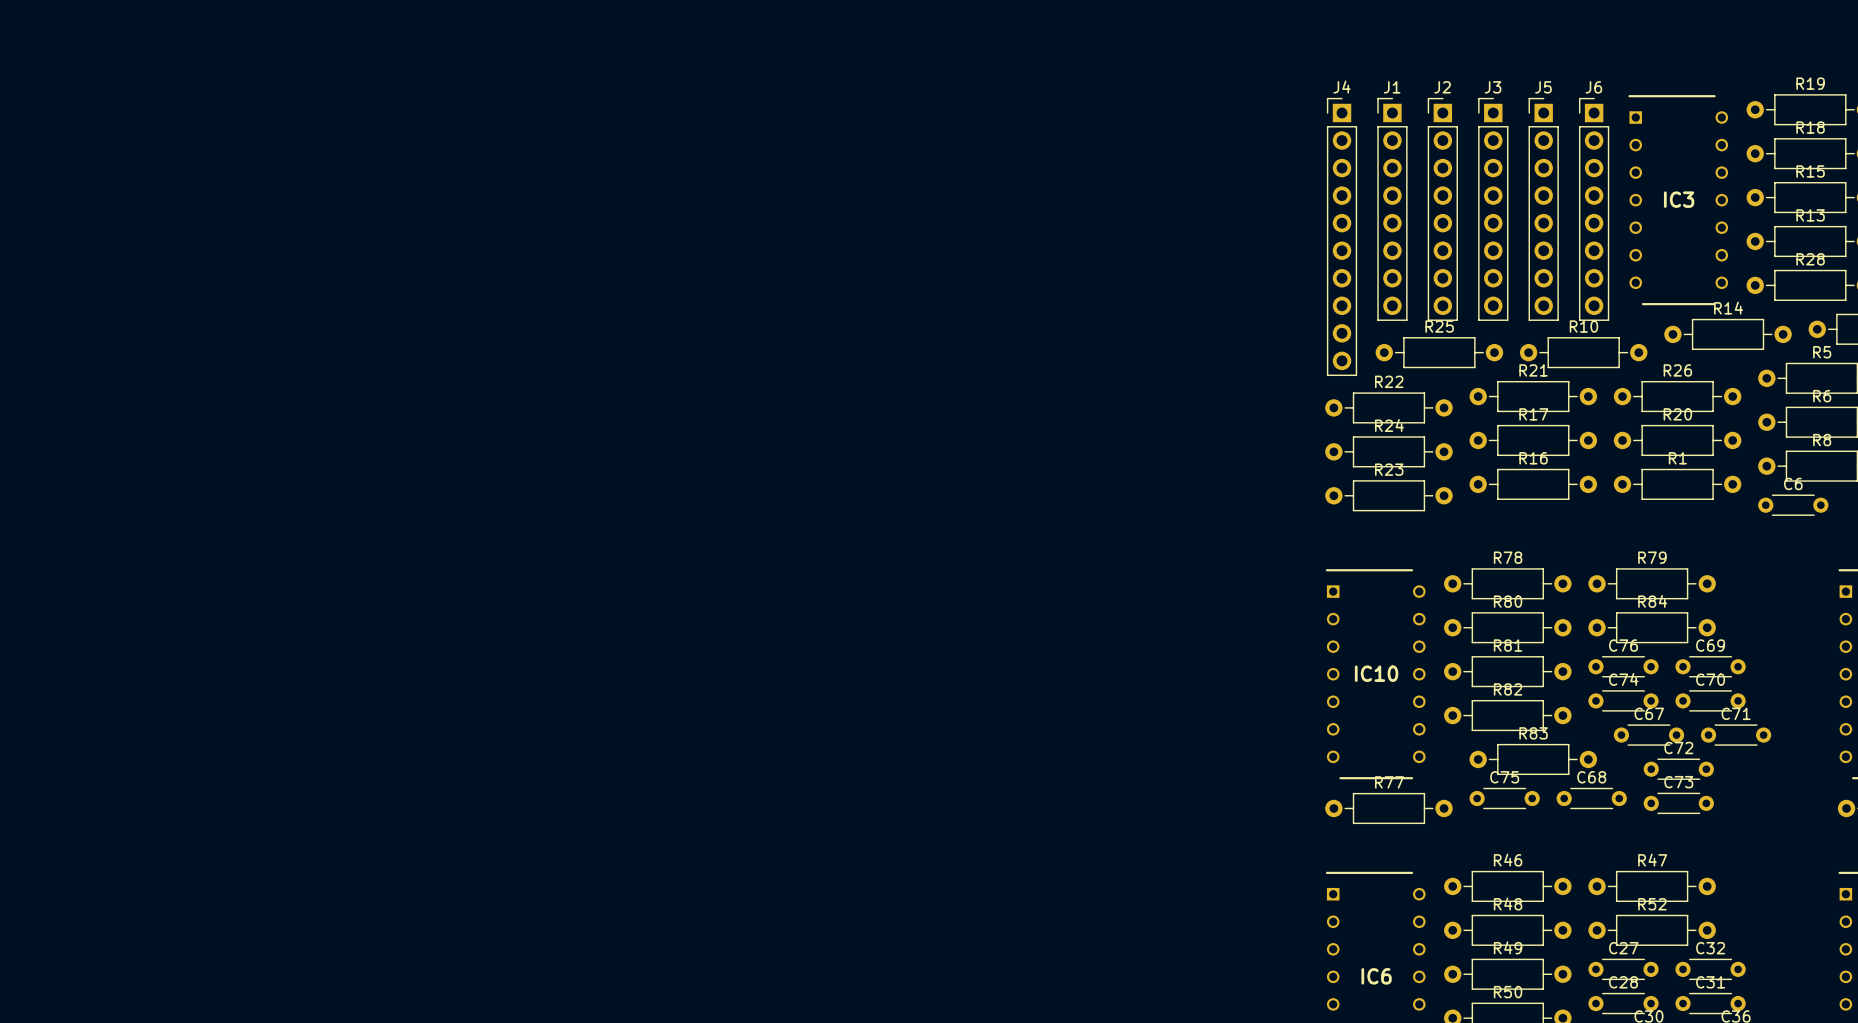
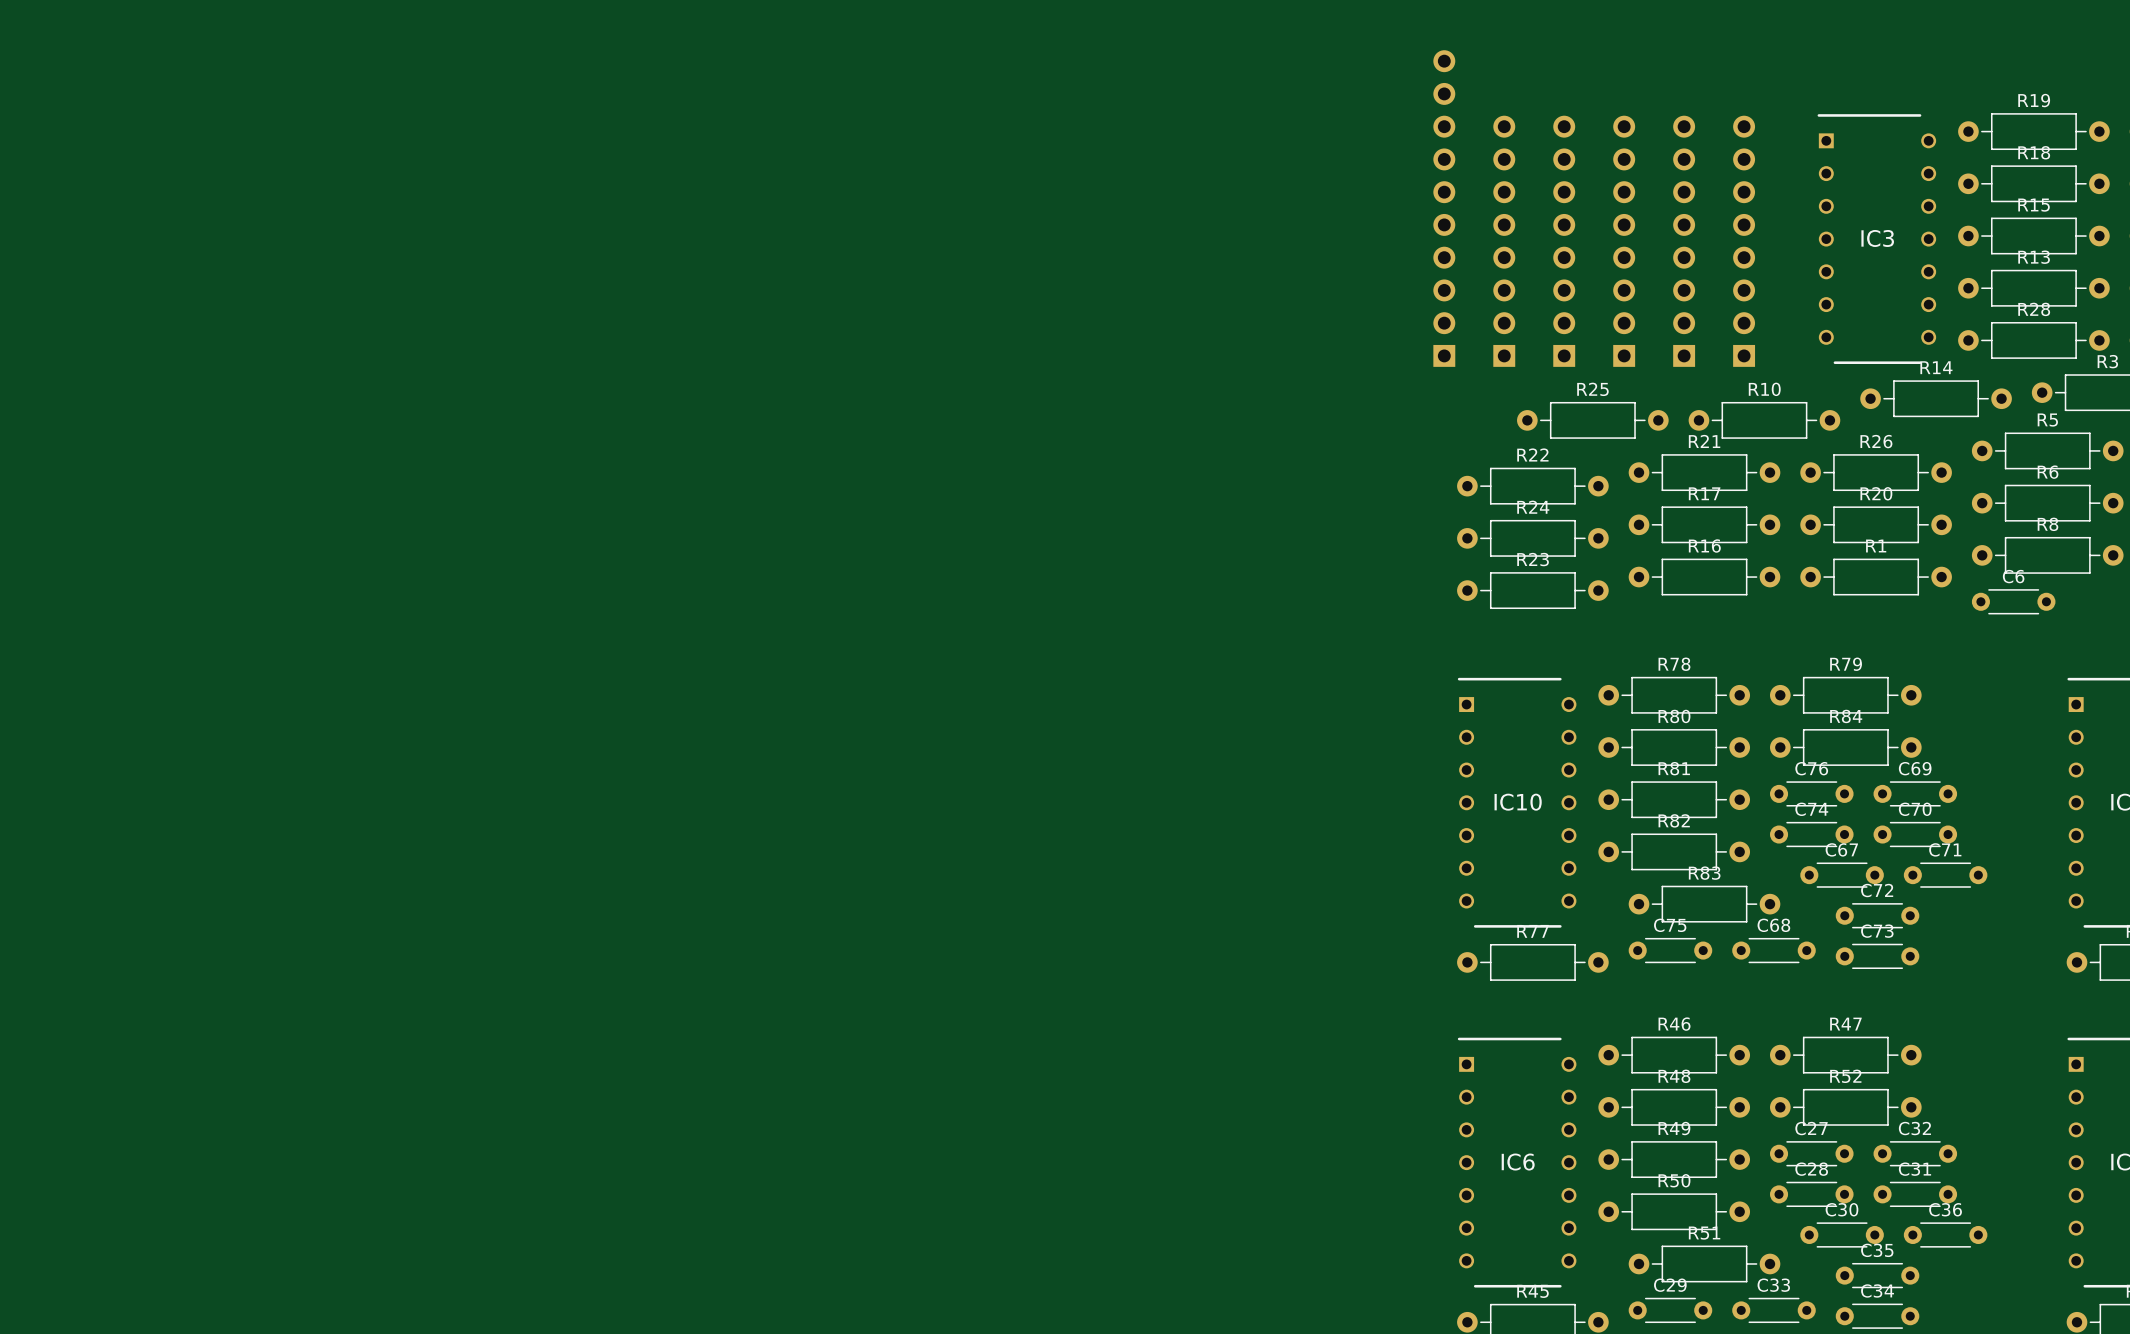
J1 side: top (1392, 209) -> bottom (1504, 241)
J2 side: top (1442, 209) -> bottom (1564, 241)
J3 side: top (1493, 209) -> bottom (1624, 241)
J5 side: top (1543, 209) -> bottom (1684, 241)
J6 side: top (1594, 209) -> bottom (1744, 241)
J4 side: top (1342, 236) -> bottom (1444, 208)

